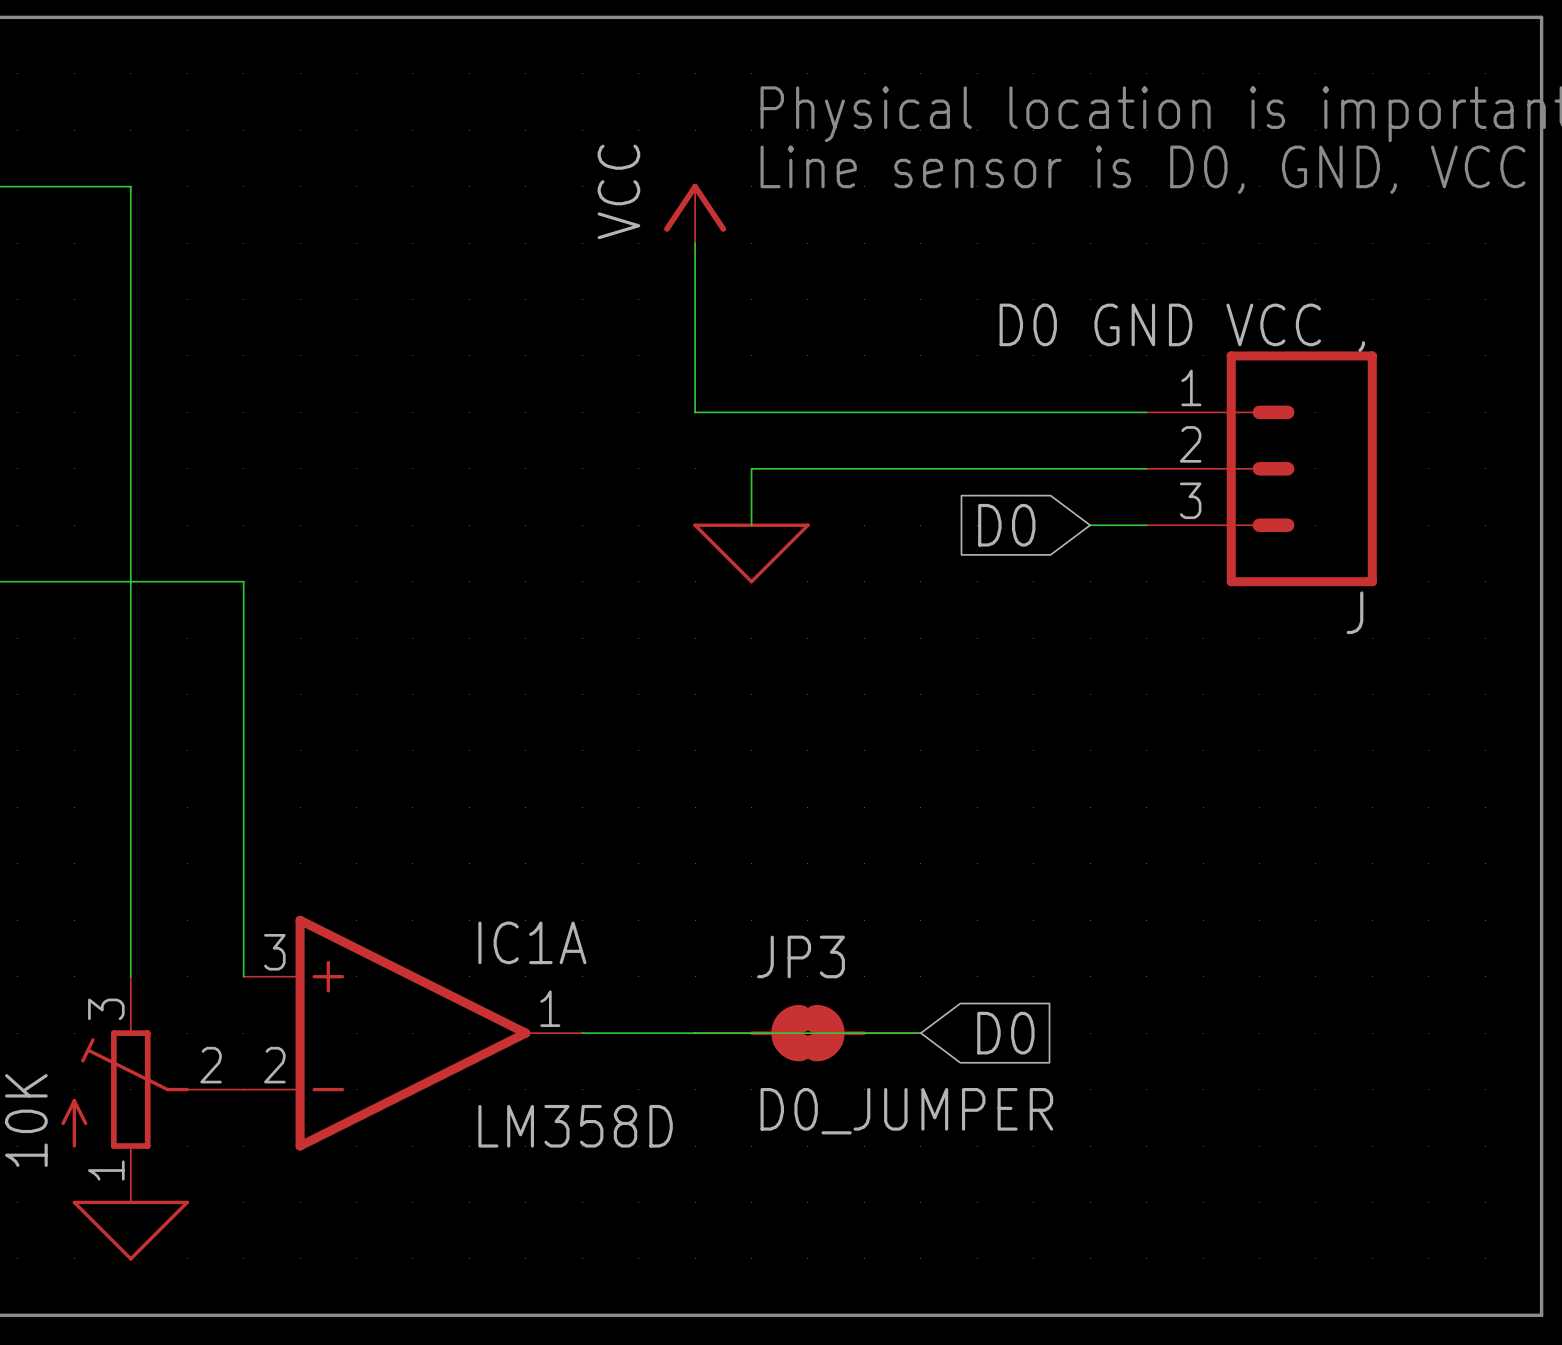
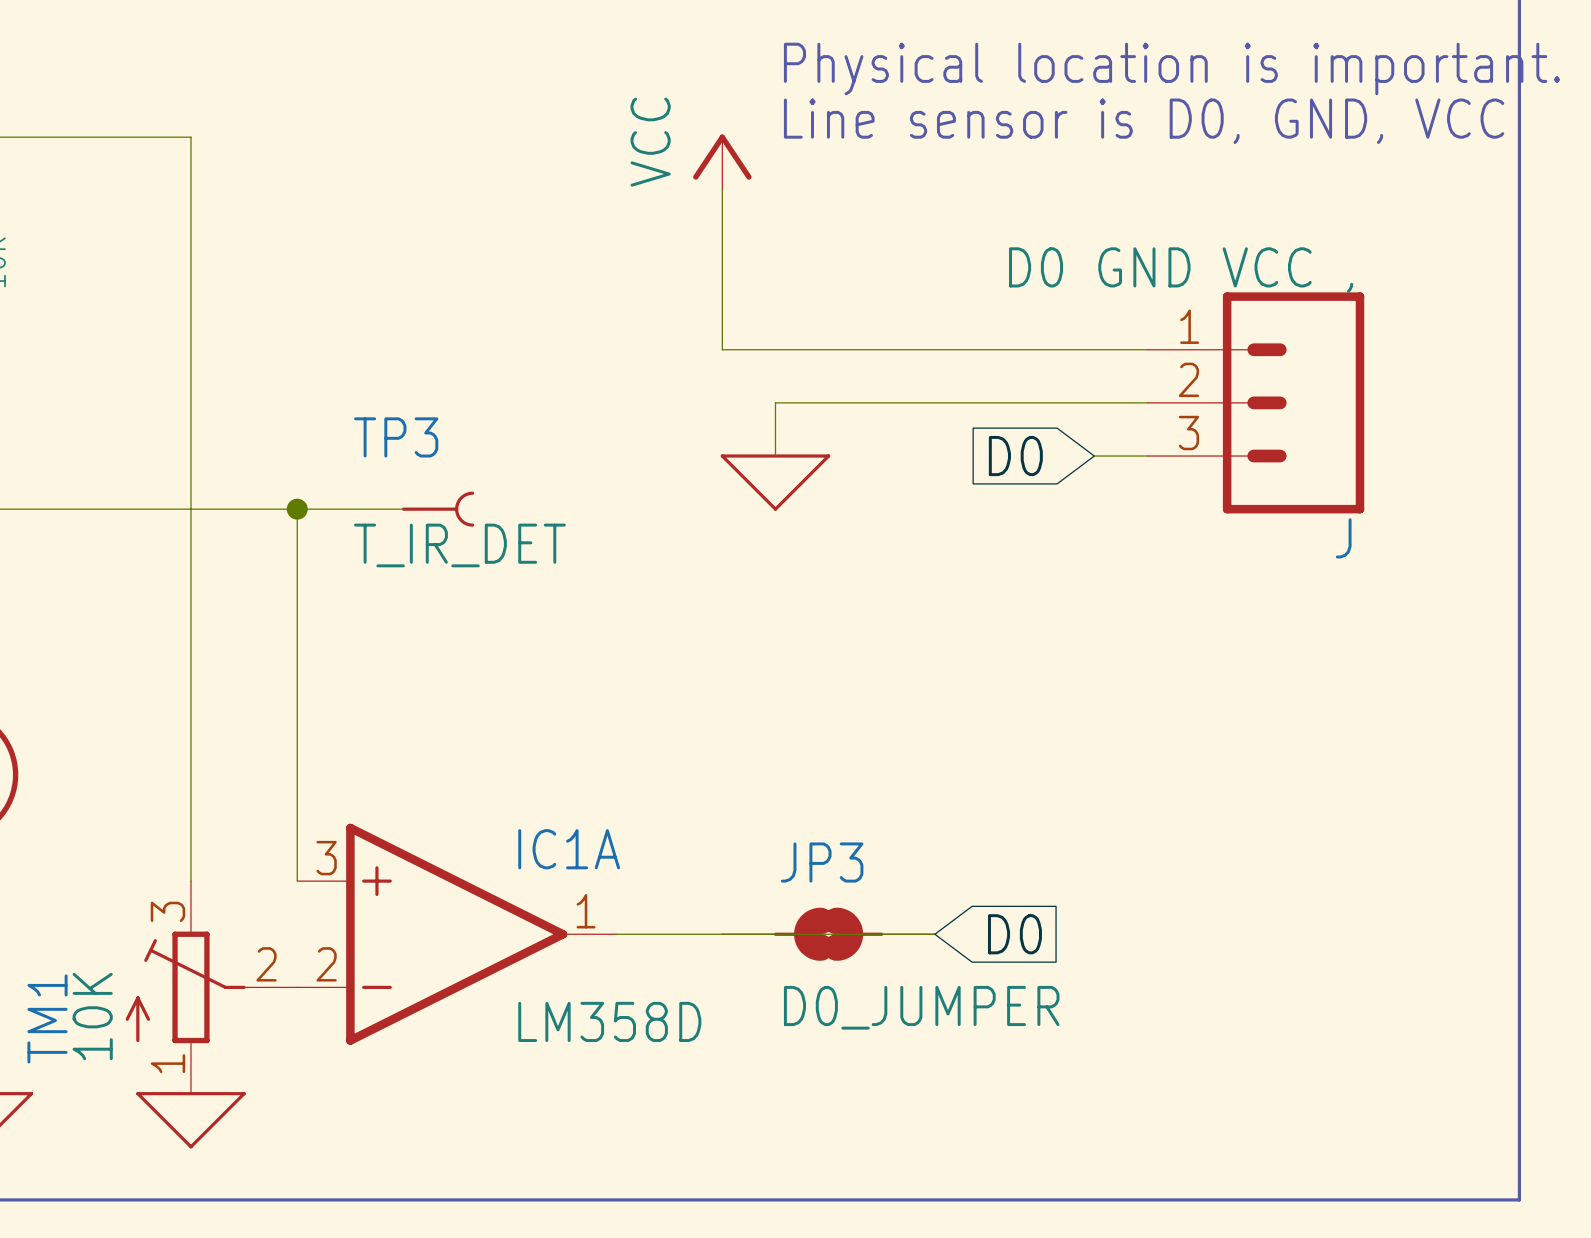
wire: none -> (297, 509) (403, 509)
junction: none -> (297, 509)
TP3: none -> T_IR_DET (438, 509)

